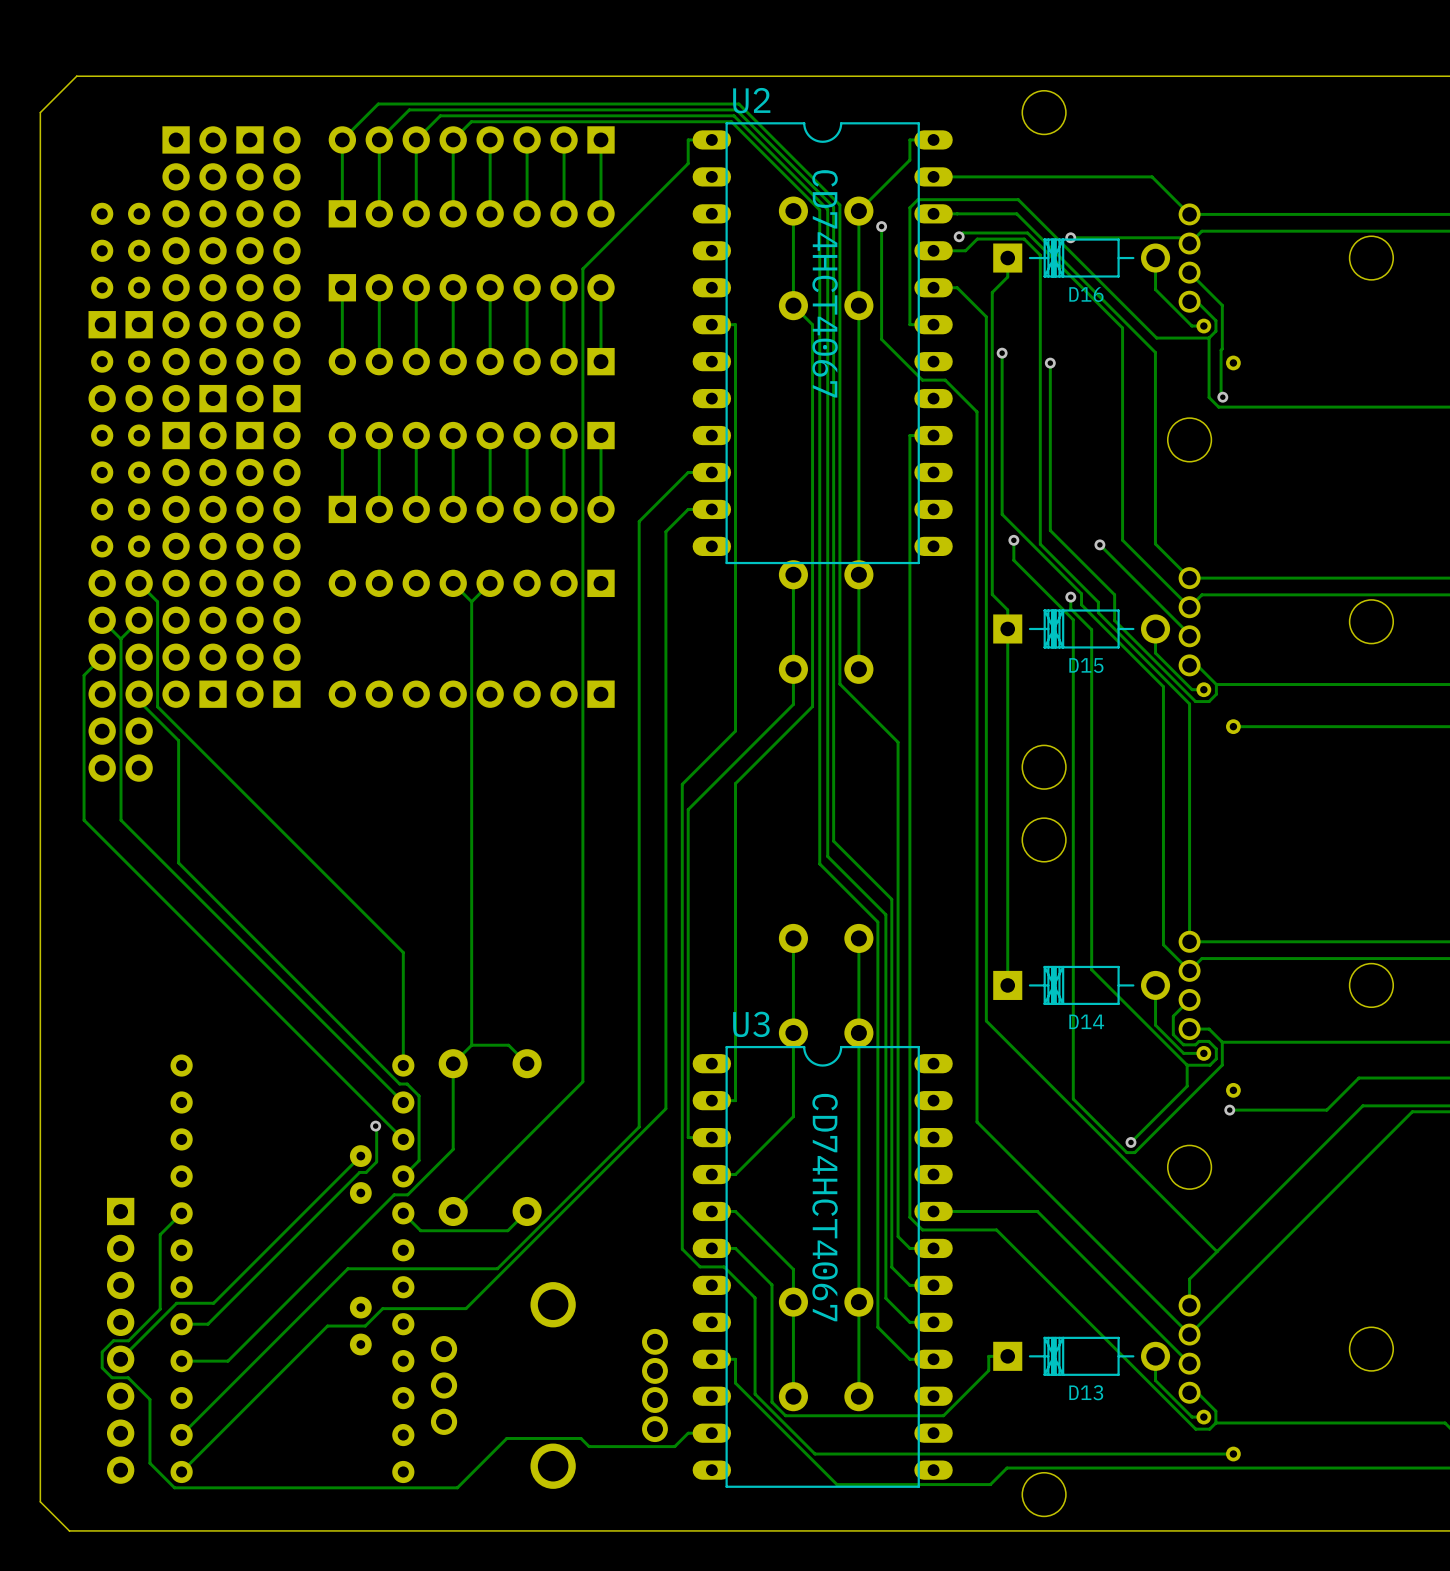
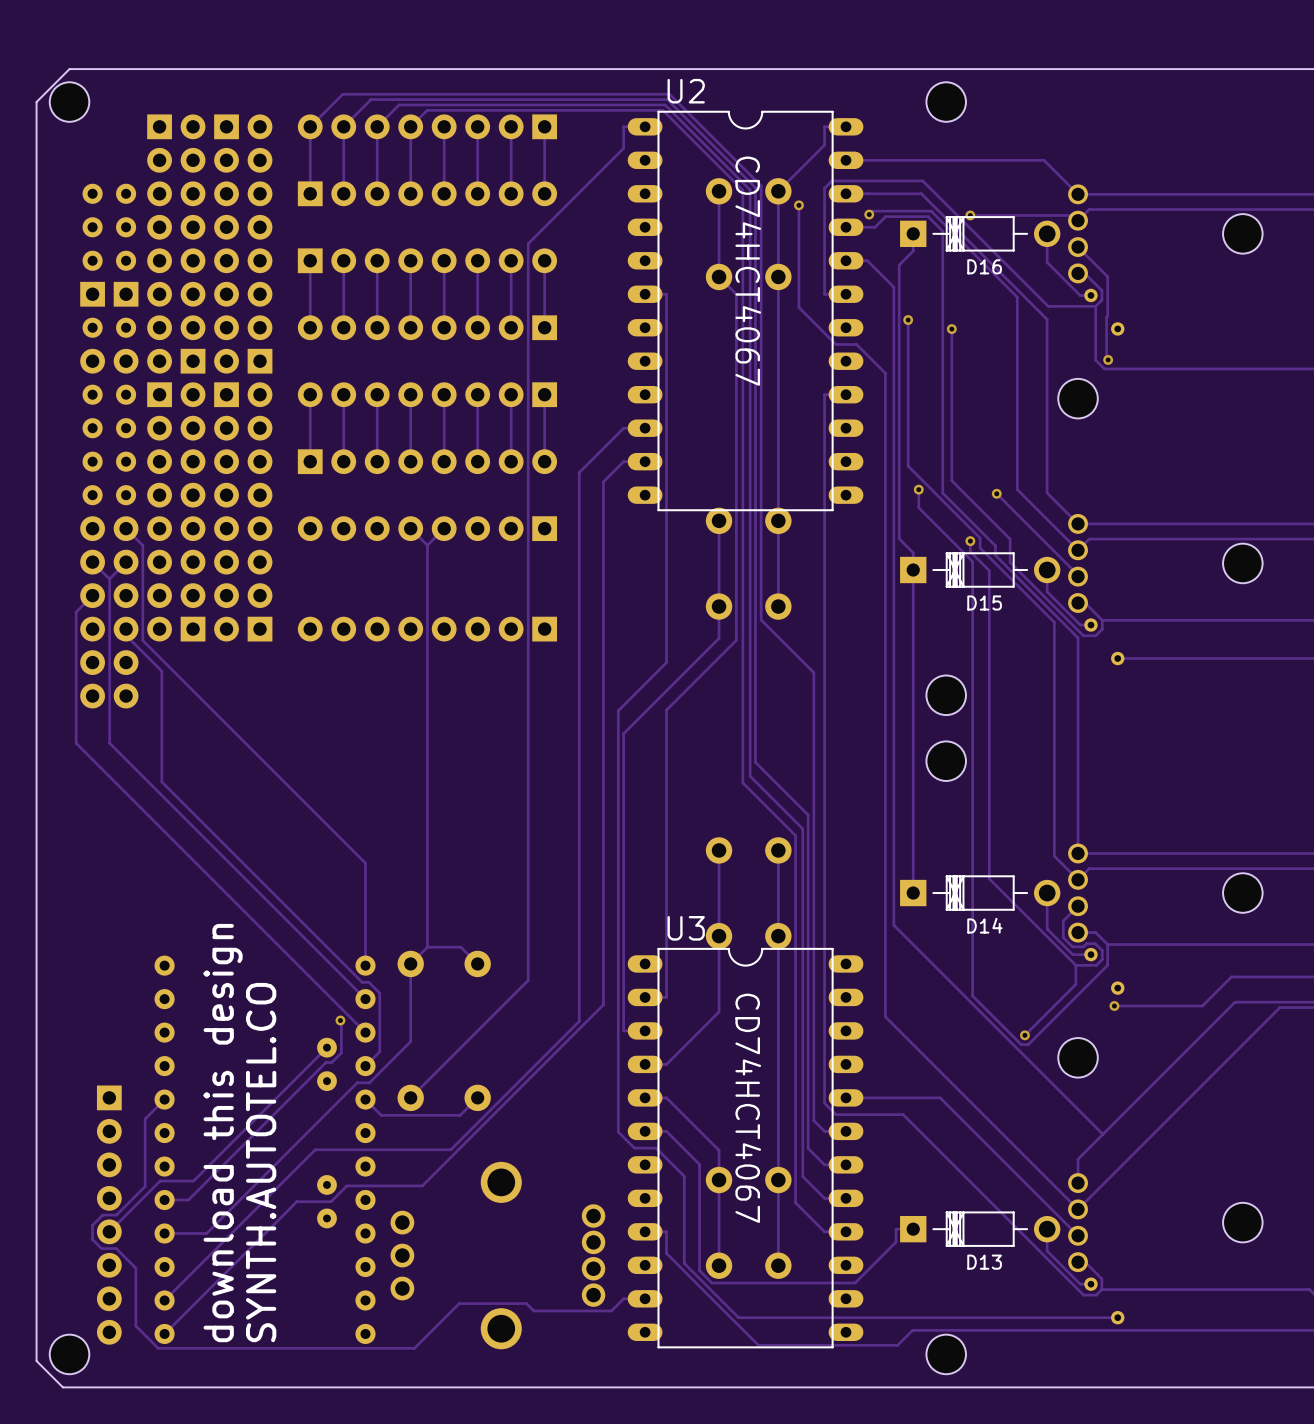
part: none -> (69, 102)
text: none -> download this design (223, 1133)
text: none -> SYNTH.AUTOTEL.CO (261, 1162)
part: none -> (69, 1354)

